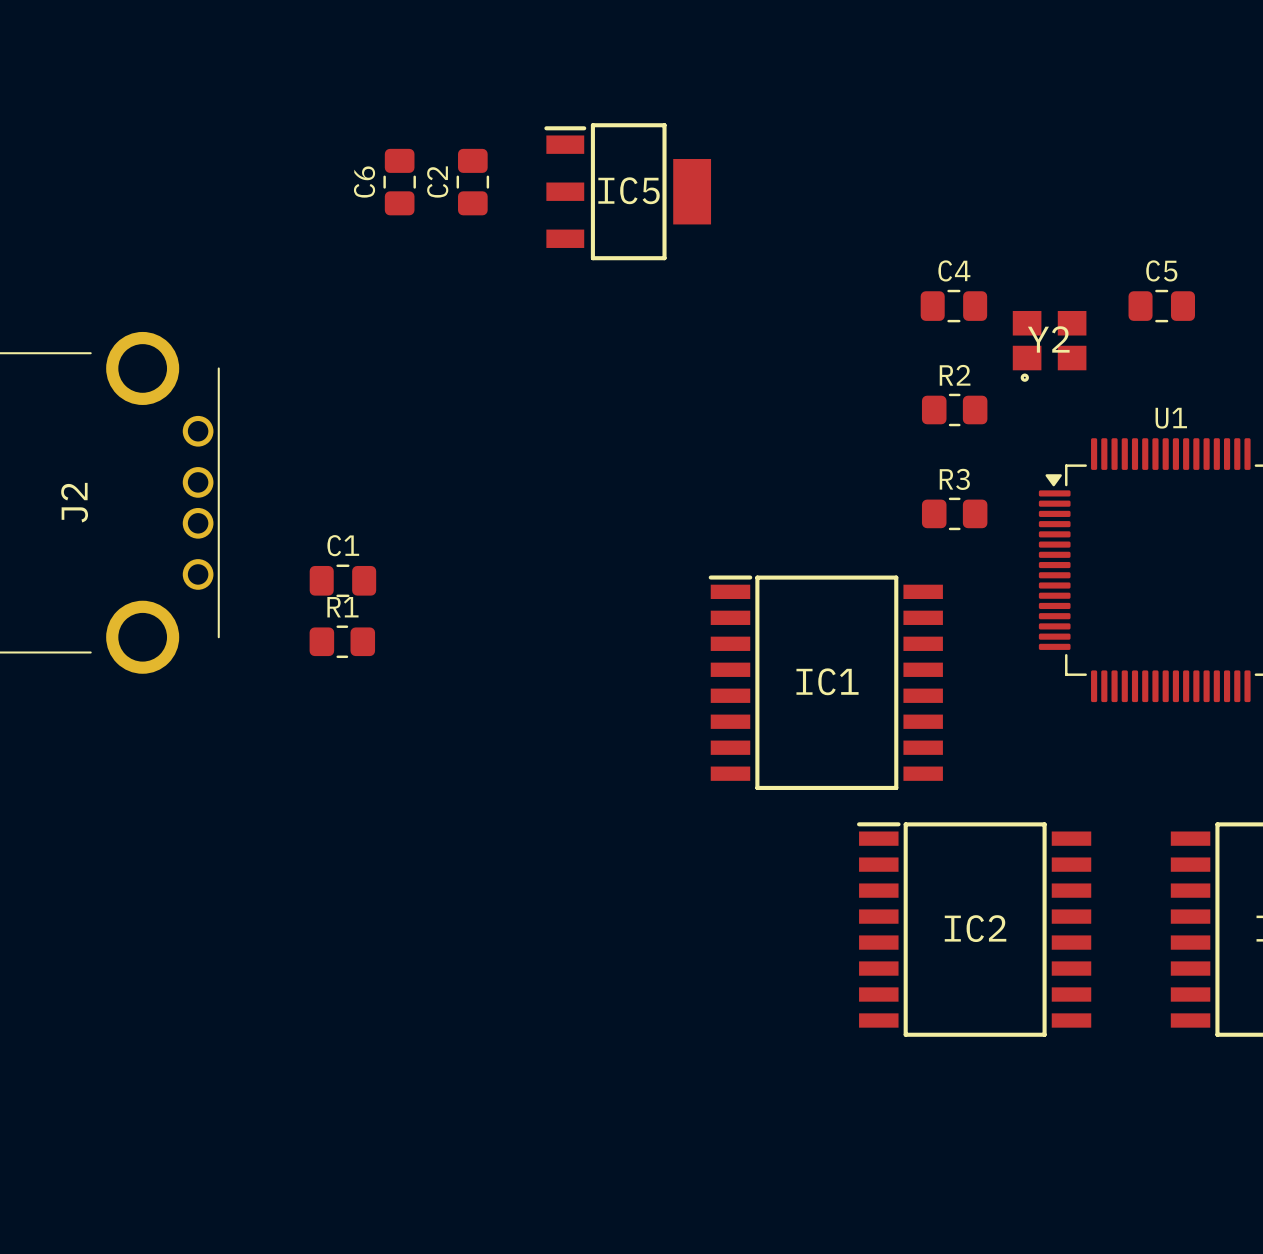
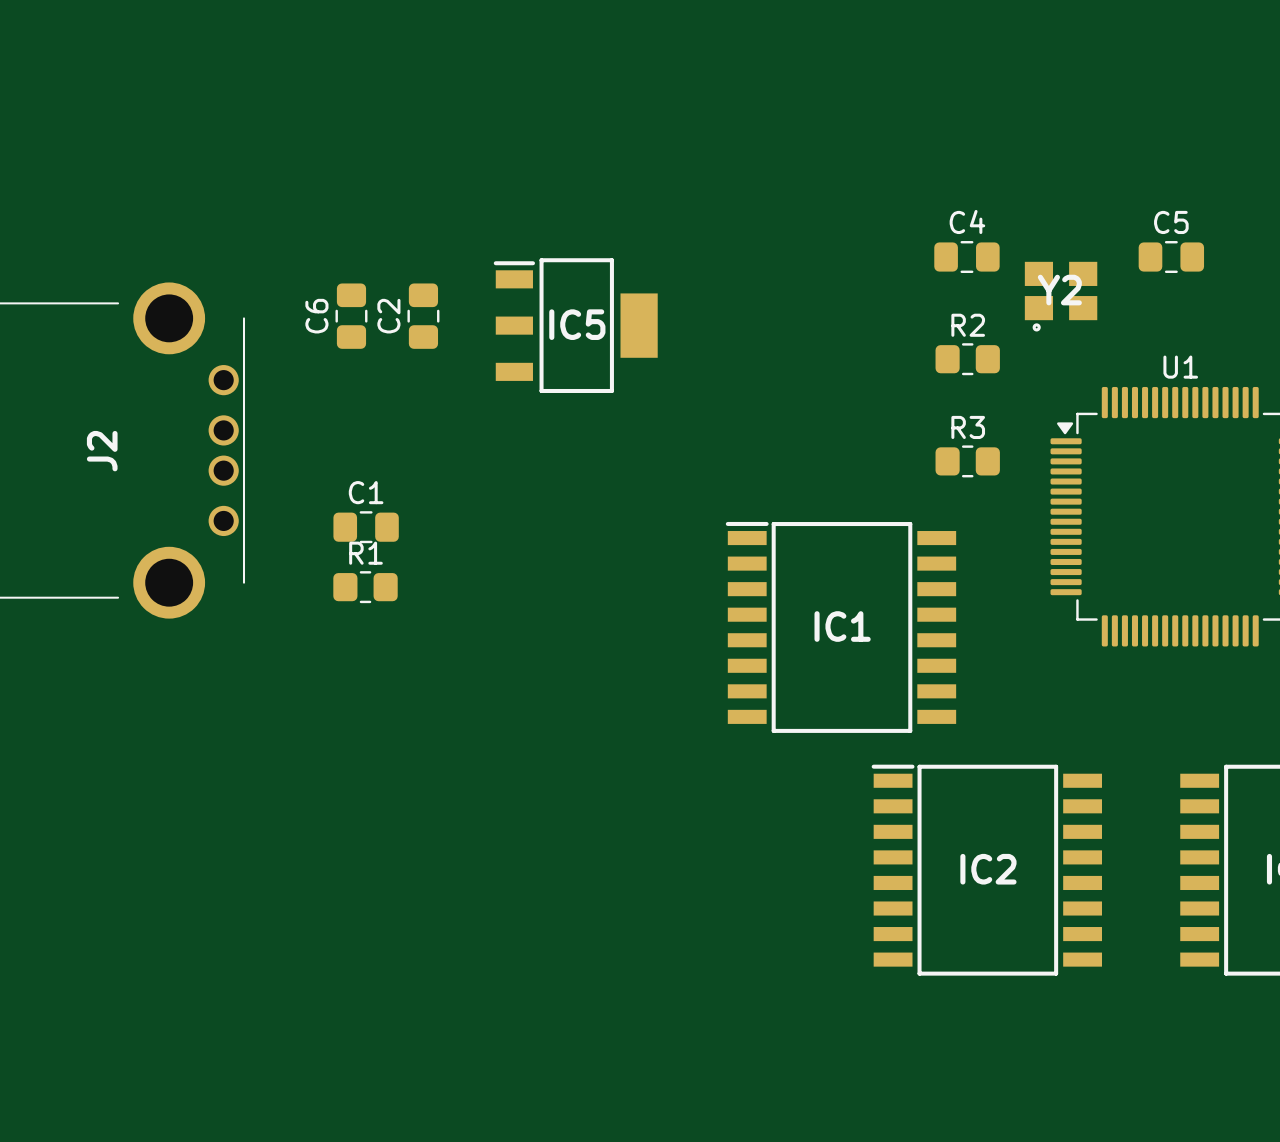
C6 position: (399, 182) -> (351, 316)
C2 position: (472, 182) -> (423, 316)
IC5 position: (627, 191) -> (575, 325)

